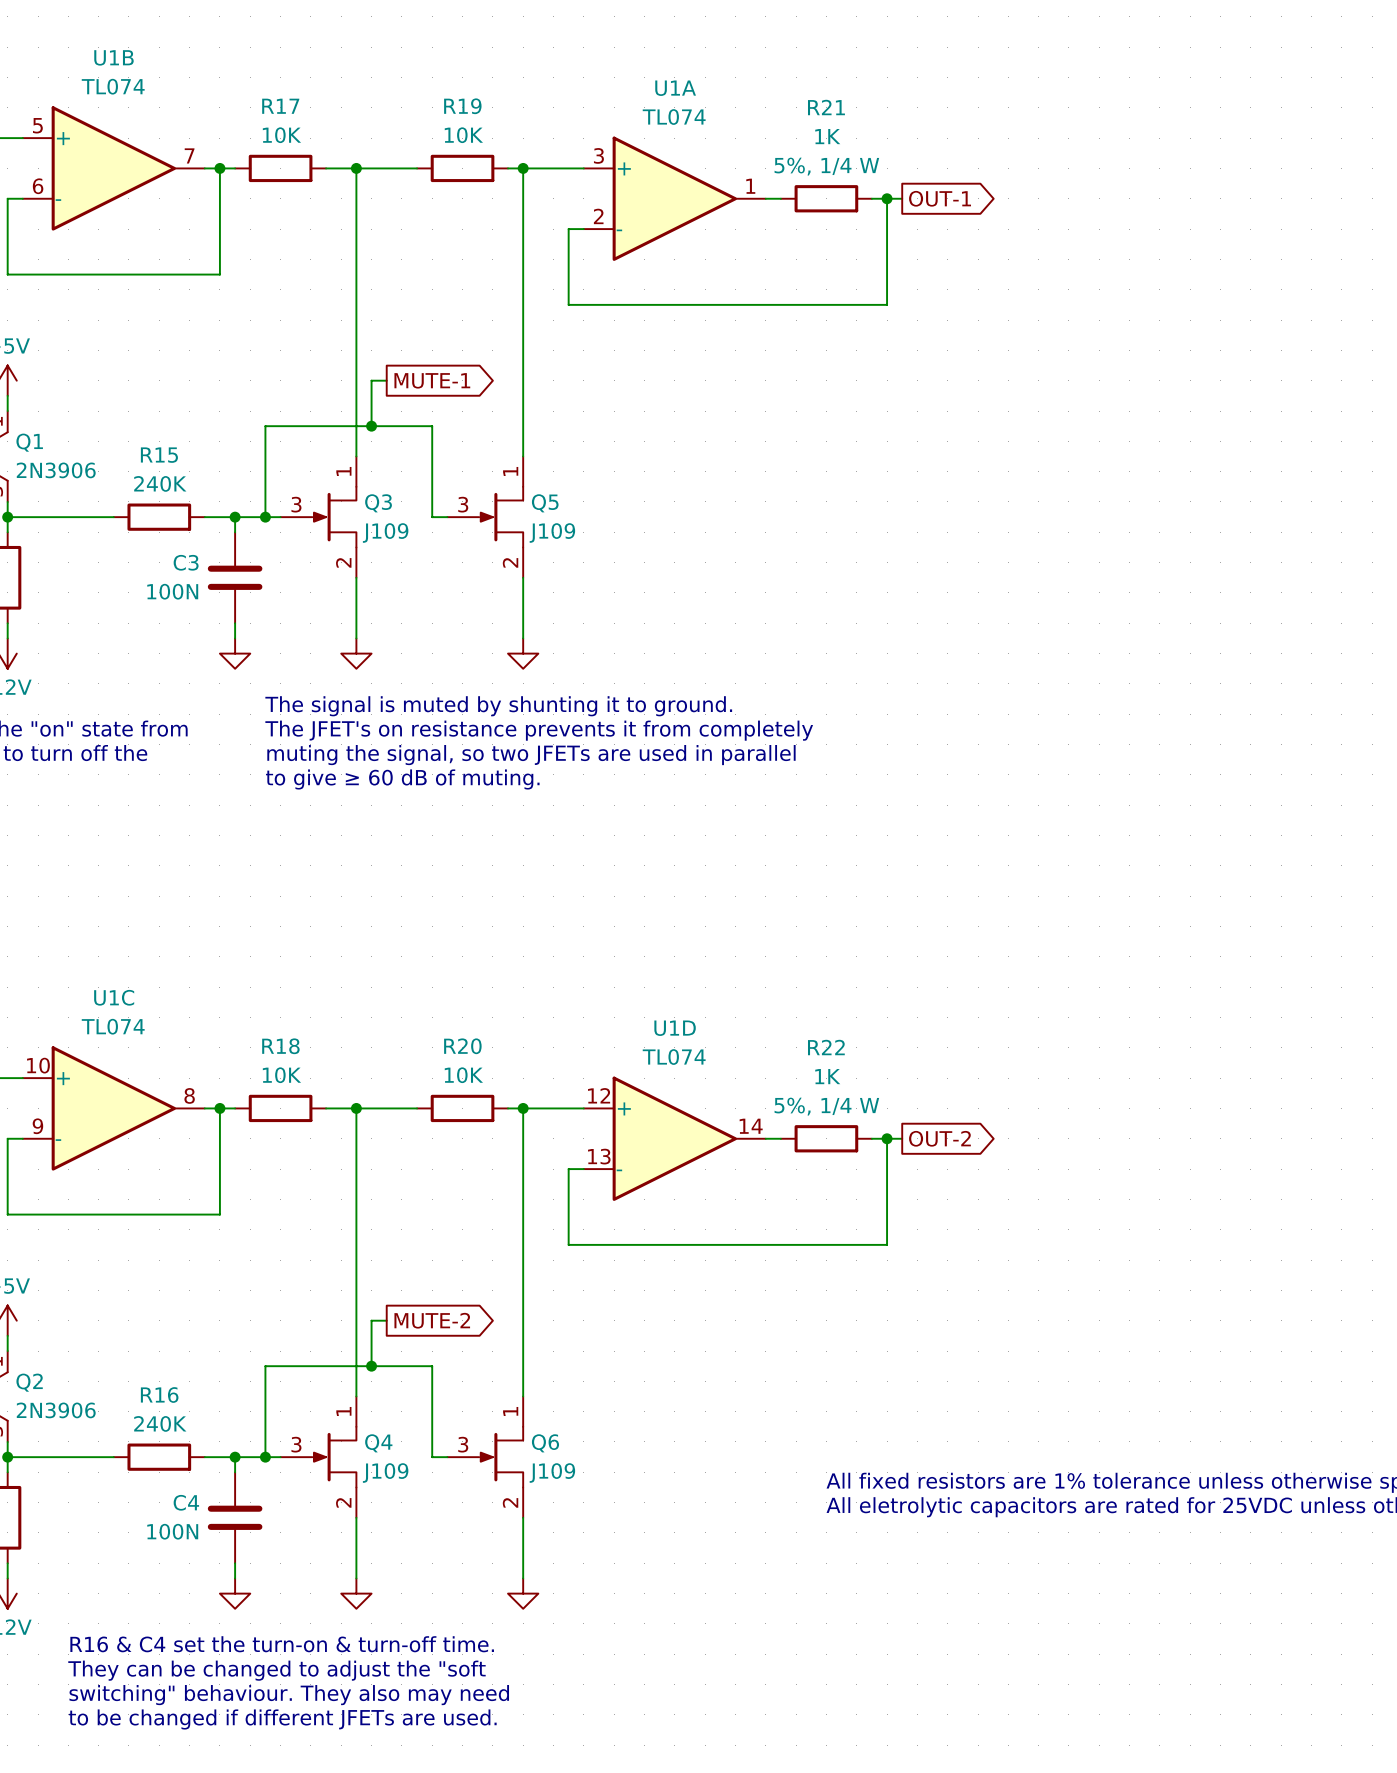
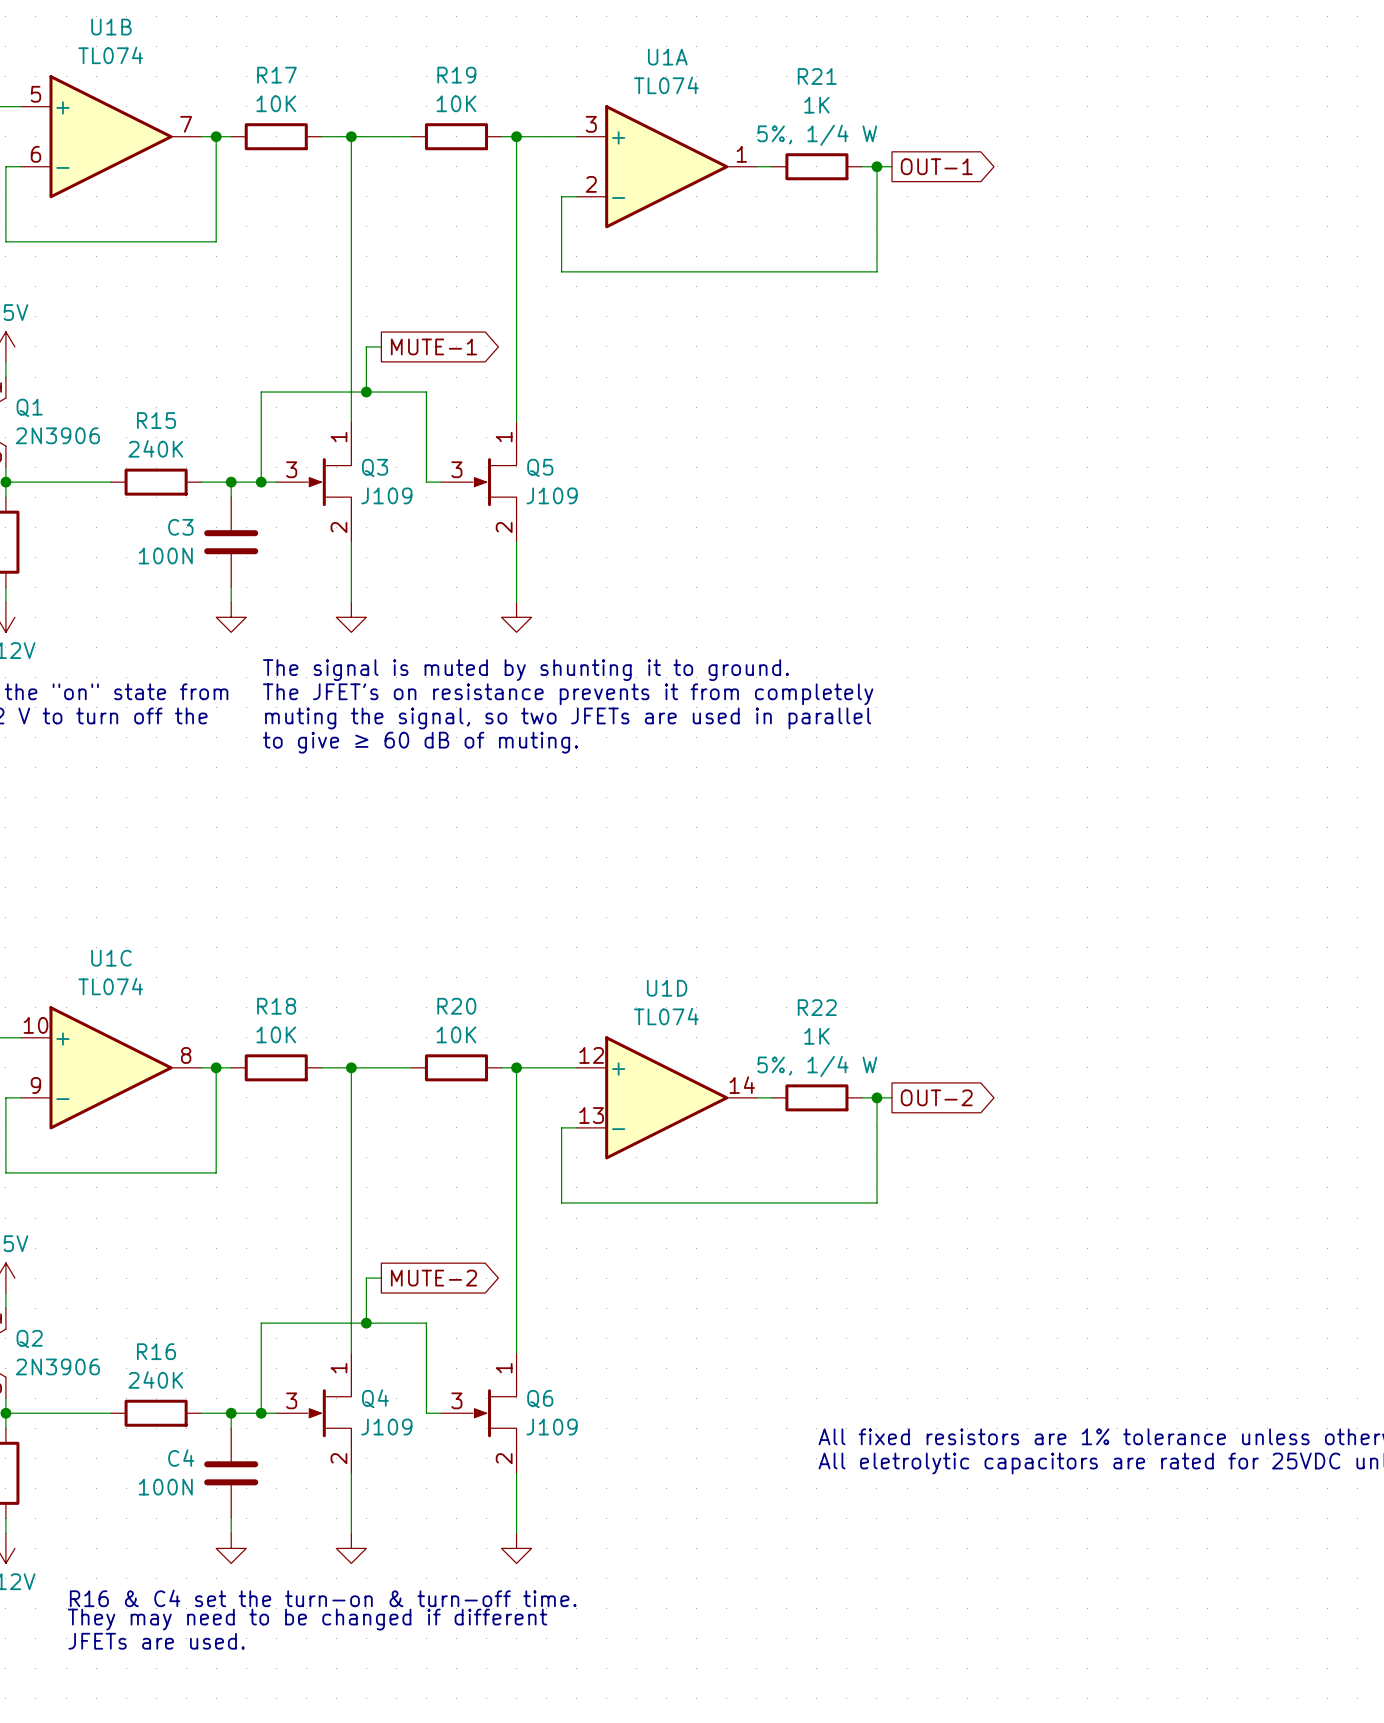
text: They can be changed to adjust the "soft (276, 1670) -> They may need to be changed if different (307, 1619)
text: switching" behaviour. They also may need (289, 1695) -> JFETs are used. (156, 1641)
text: to be changed if different JFETs are used. (282, 1719) -> none

